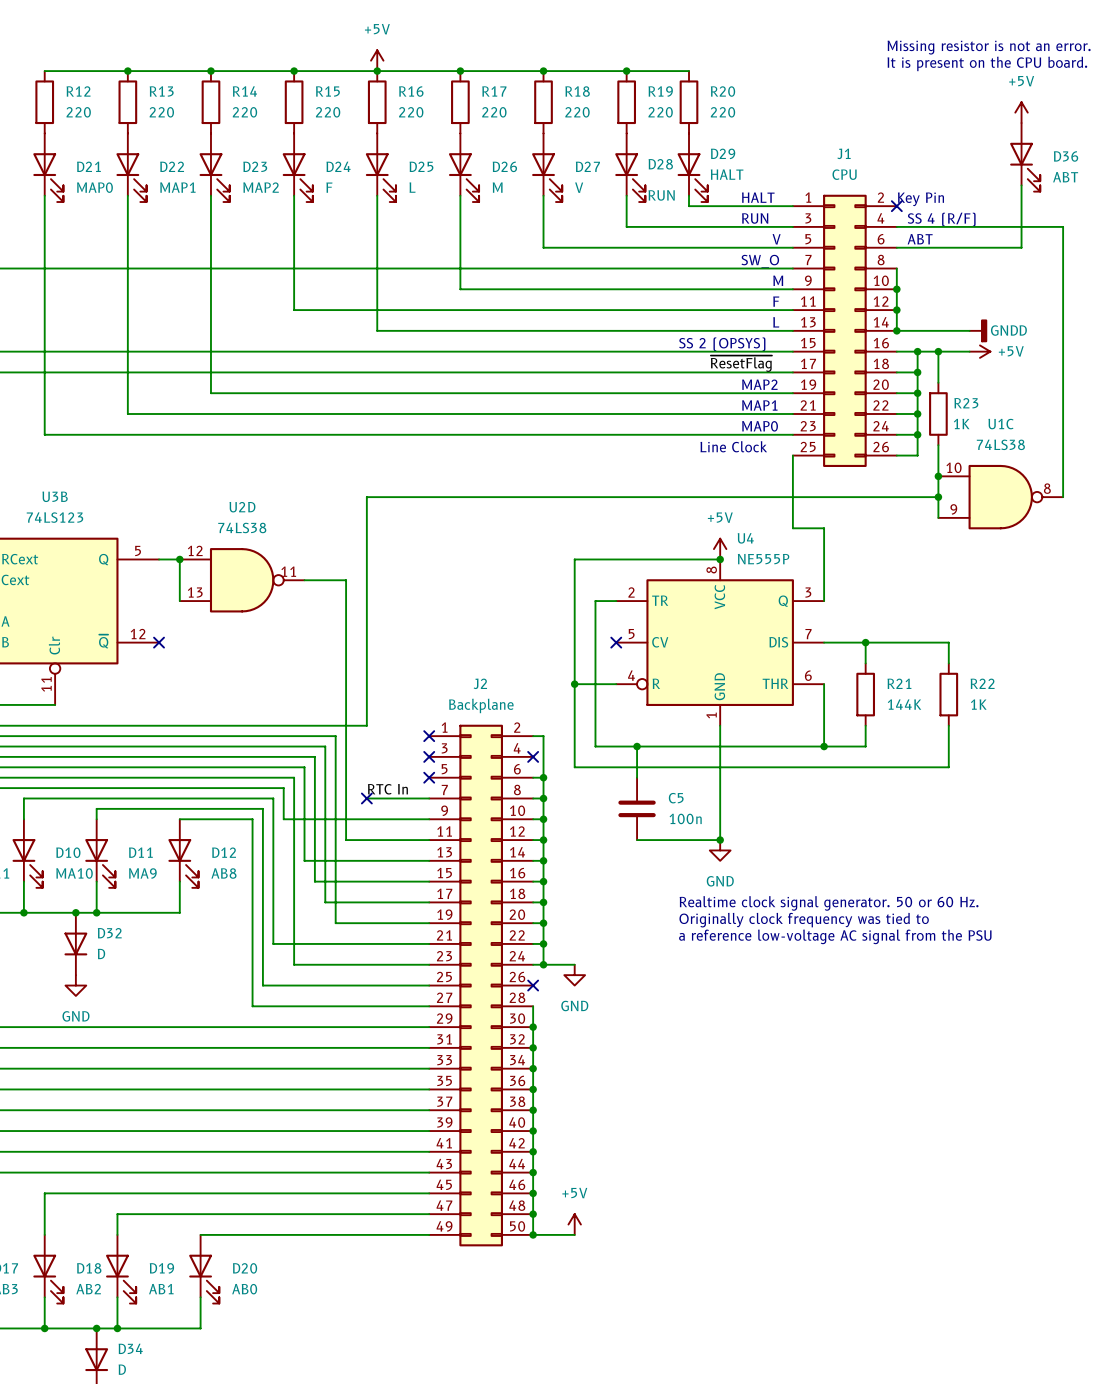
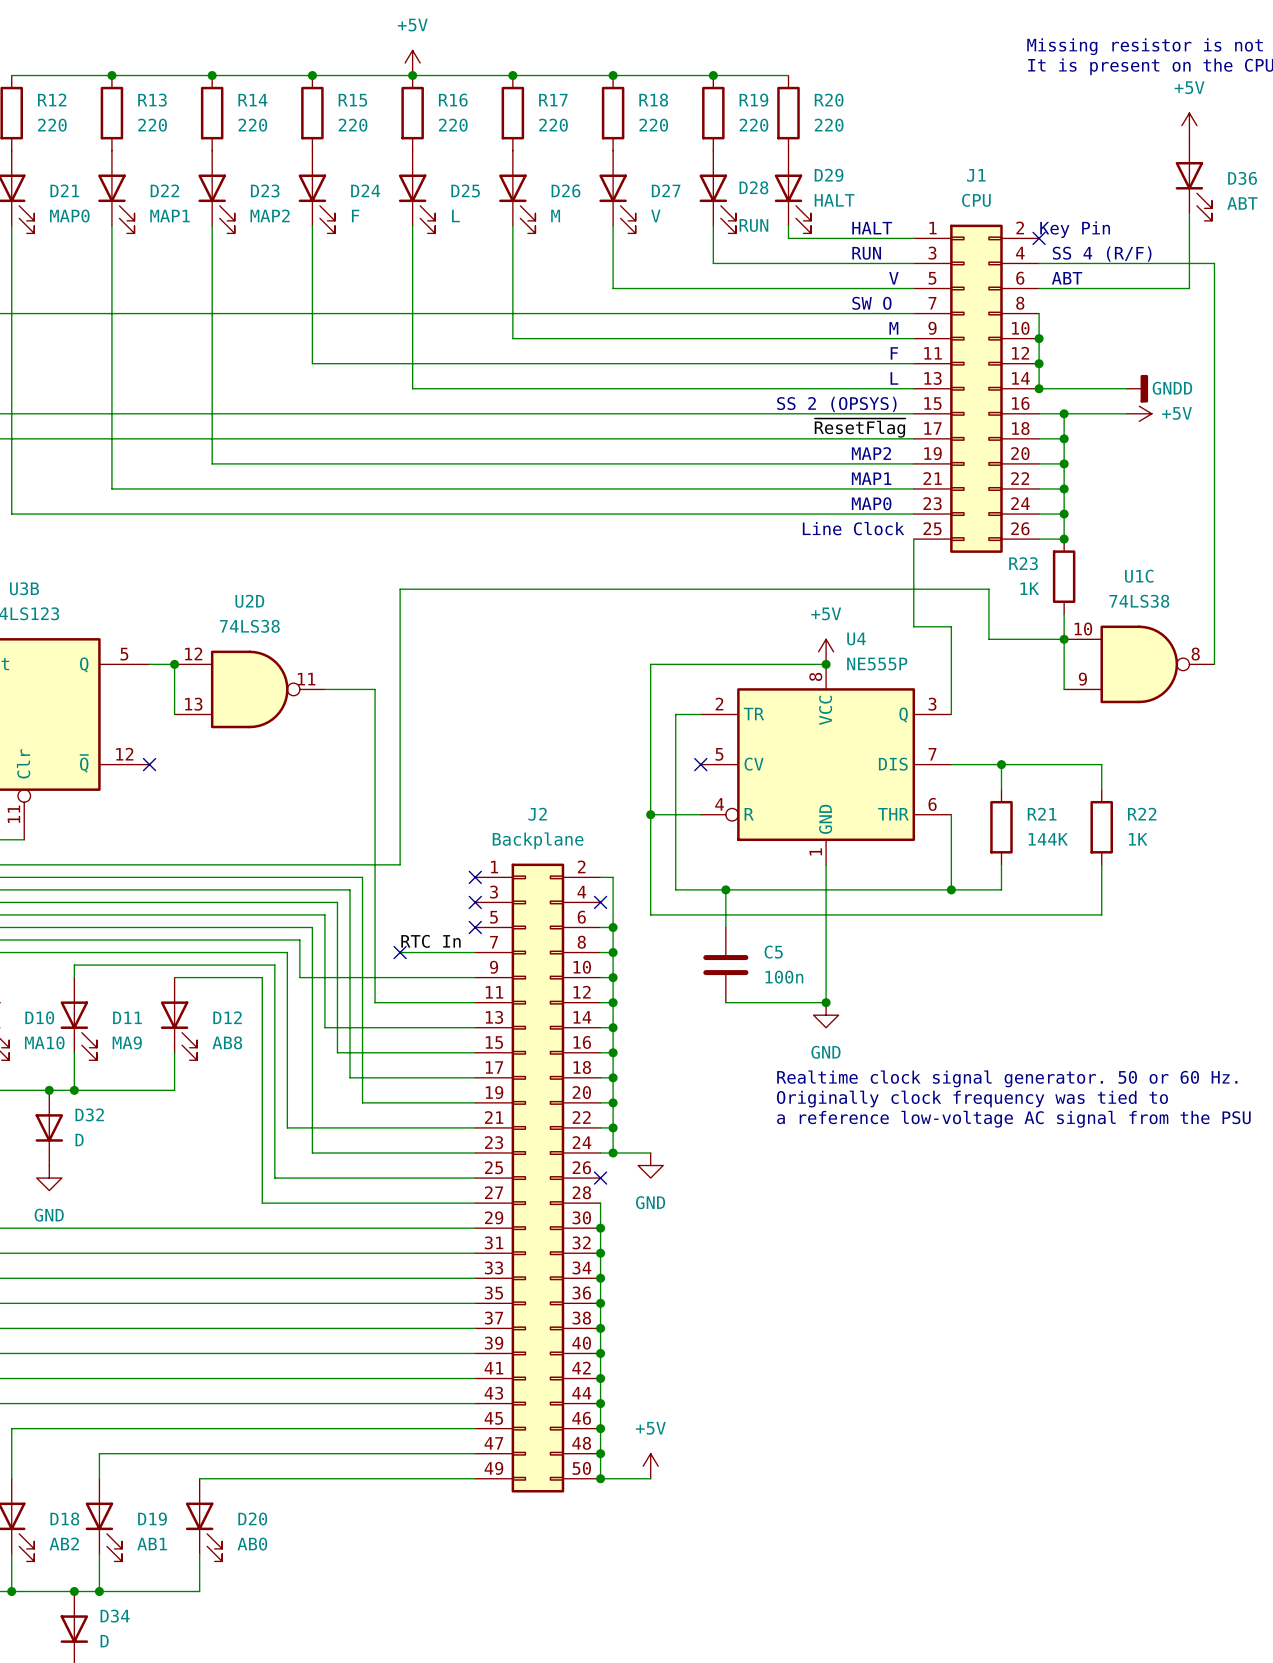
wire: (1042, 226) (1063, 226) (1063, 497) -> (1214, 263) (1214, 664)
wire: (938, 351) (938, 382) -> none
junction: (938, 351) -> none
R23 name position: R23 (966, 403) -> R23 (1023, 563)
R23 position: (938, 413) -> (1064, 576)
R23 value position: 1K (961, 424) -> 1K (1029, 588)
wire: (938, 445) (938, 517) -> none
junction: none -> (1064, 539)
junction: (938, 476) -> none
wire: (855, 497) (938, 497) -> (988, 589) (988, 639) (1064, 639)
junction: (938, 497) -> none
U1C position: (1000, 497) -> (1139, 664)
wire: none -> (1064, 614) (1064, 689)
junction: none -> (1064, 639)

